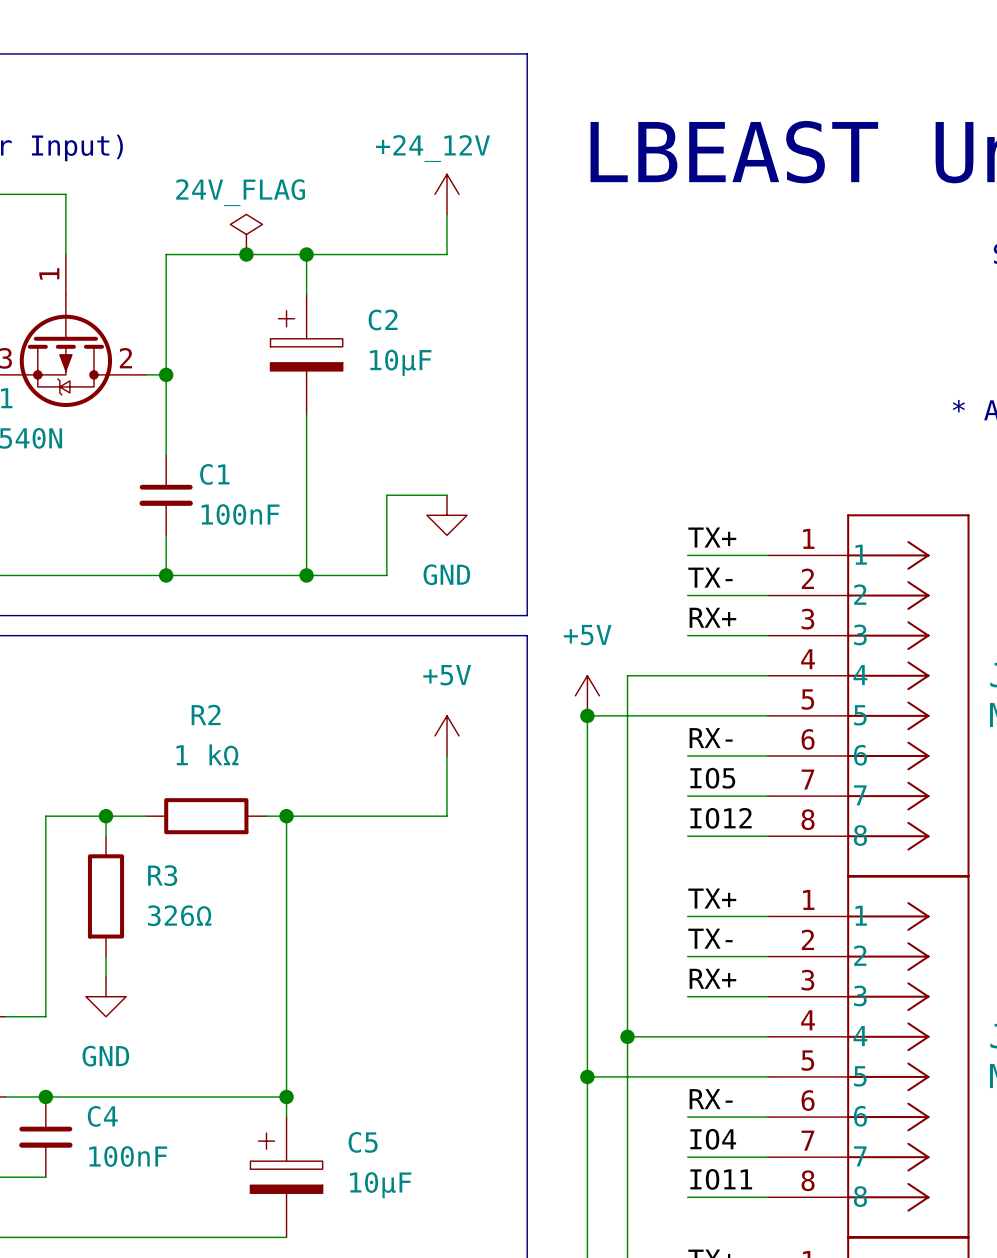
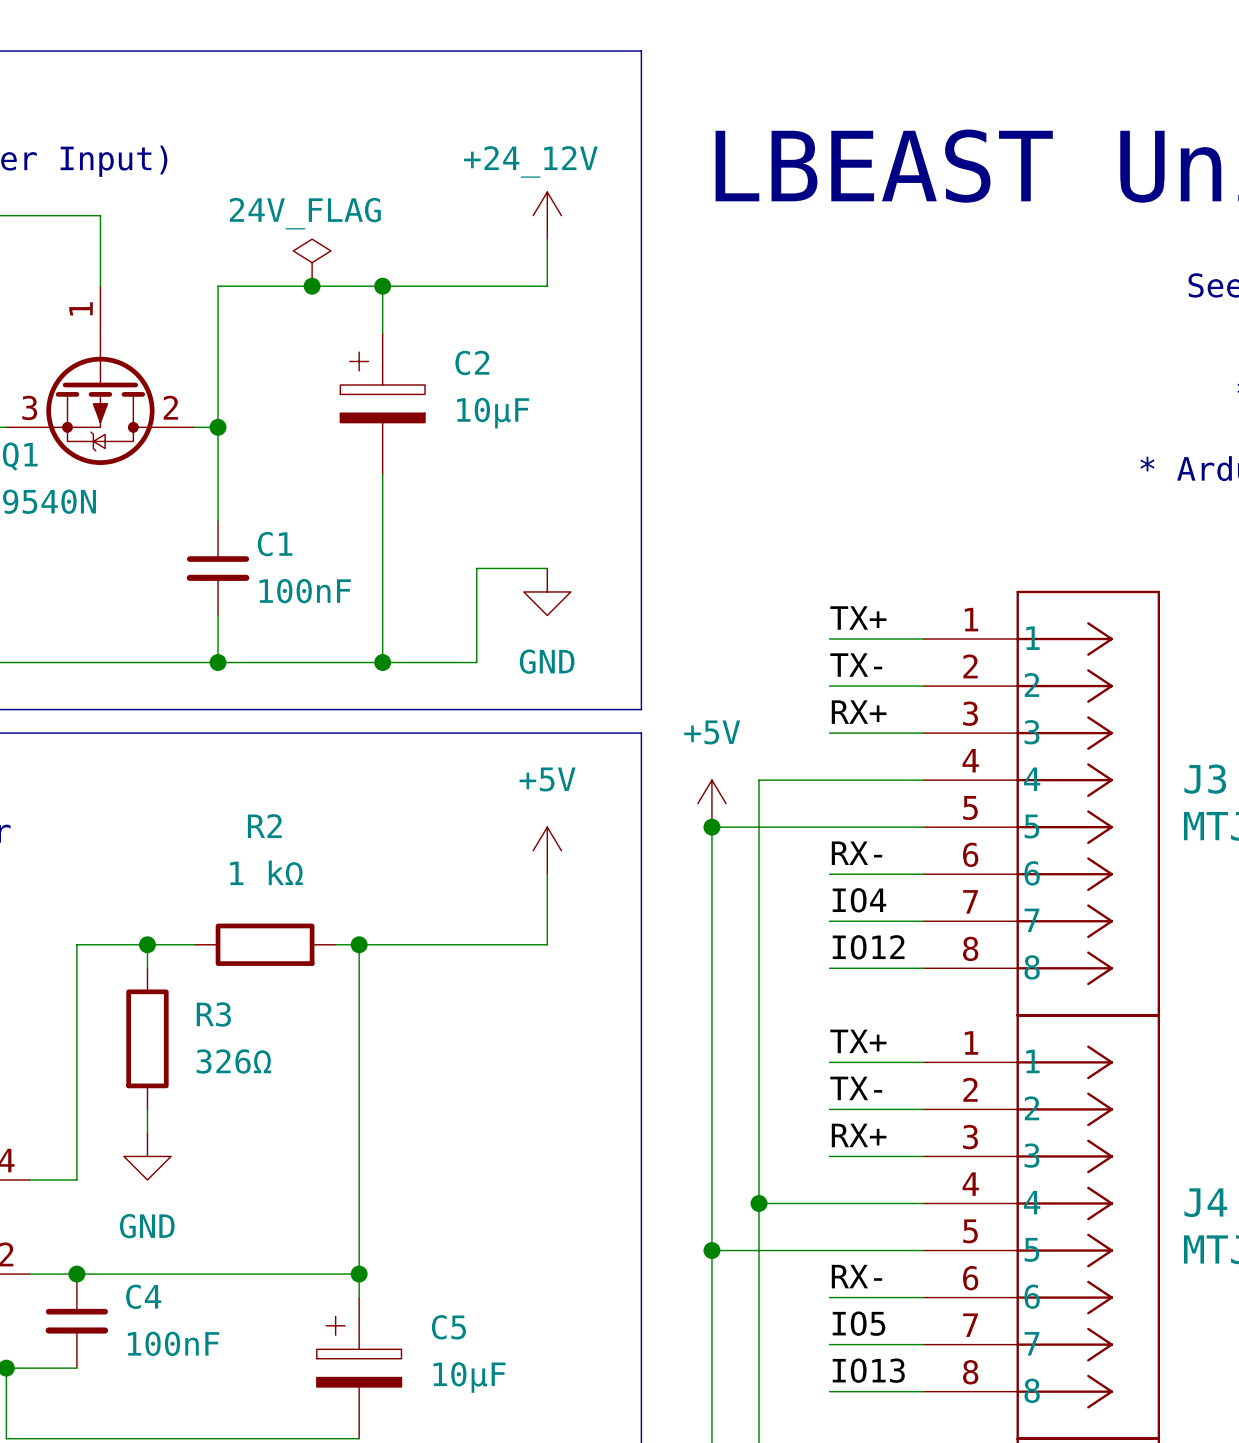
label: IO5 (712, 778) -> IO4 (859, 900)
label: IO4 (713, 1139) -> IO5 (858, 1323)
label: IO11 (721, 1179) -> IO13 (868, 1370)

